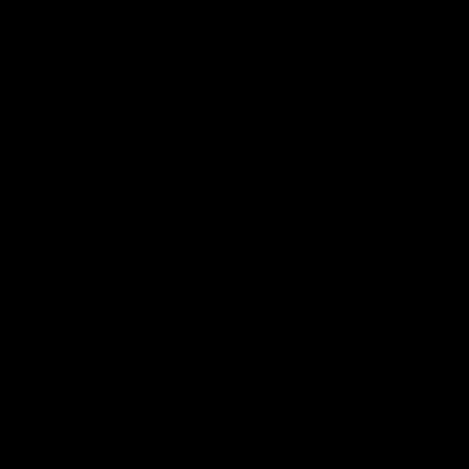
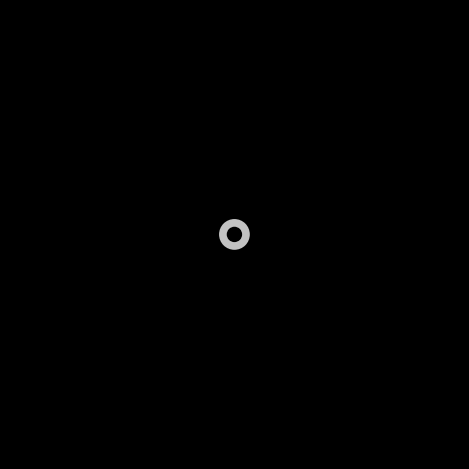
via: none -> (234, 234)

